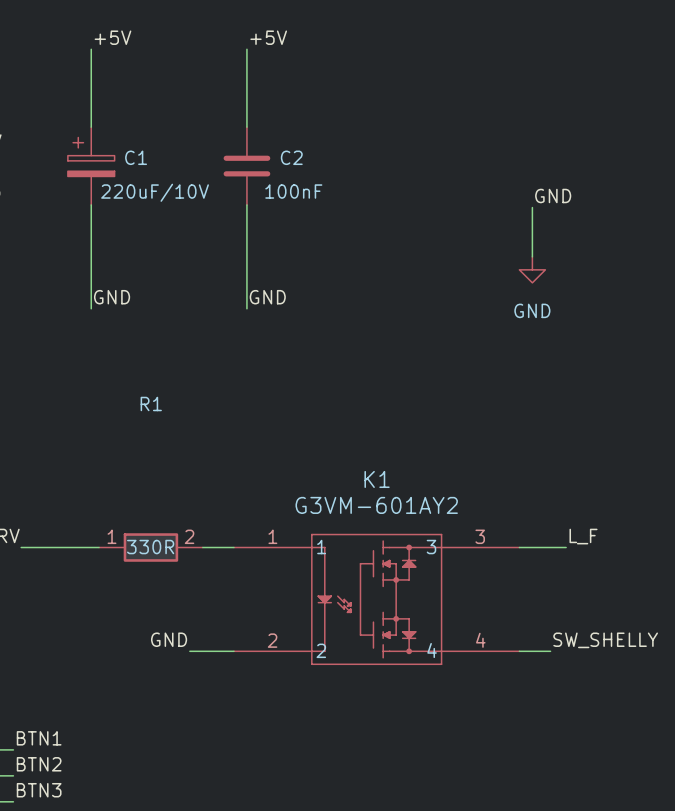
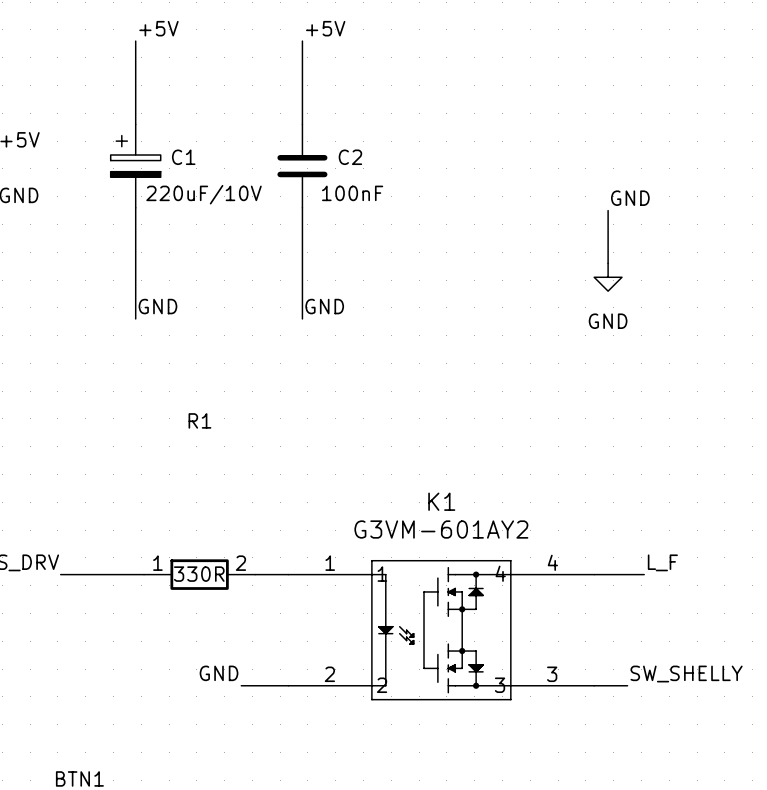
K1 pin number: 3 (480, 536) -> 4 (552, 562)
K1 pin name: 3 (431, 547) -> 4 (500, 573)
K1 pin number: 4 (480, 640) -> 3 (552, 674)
K1 pin name: 4 (432, 650) -> 3 (500, 685)

